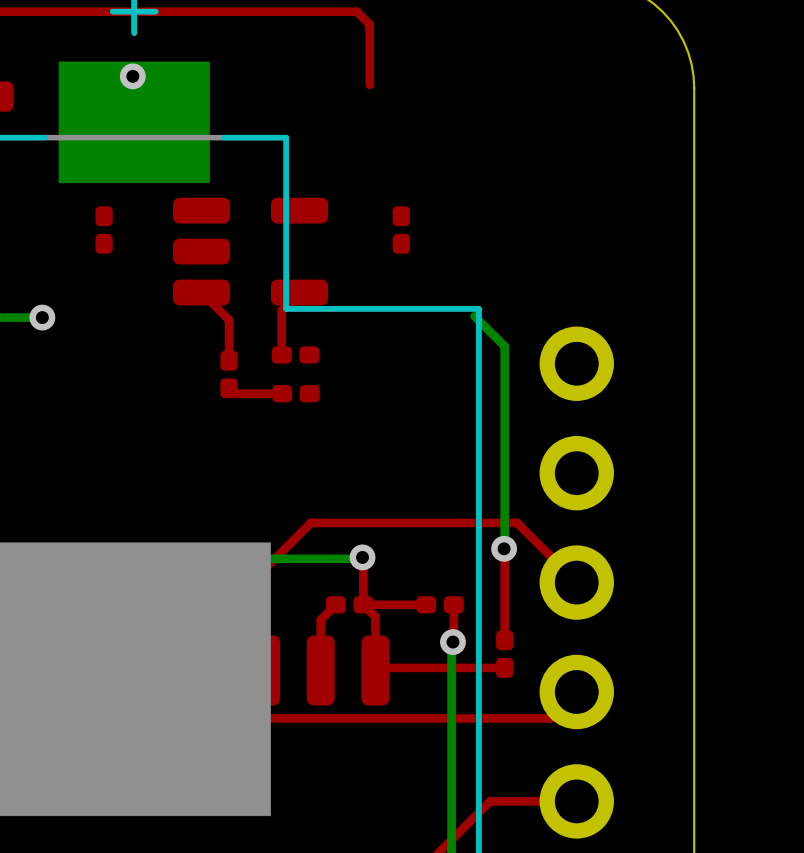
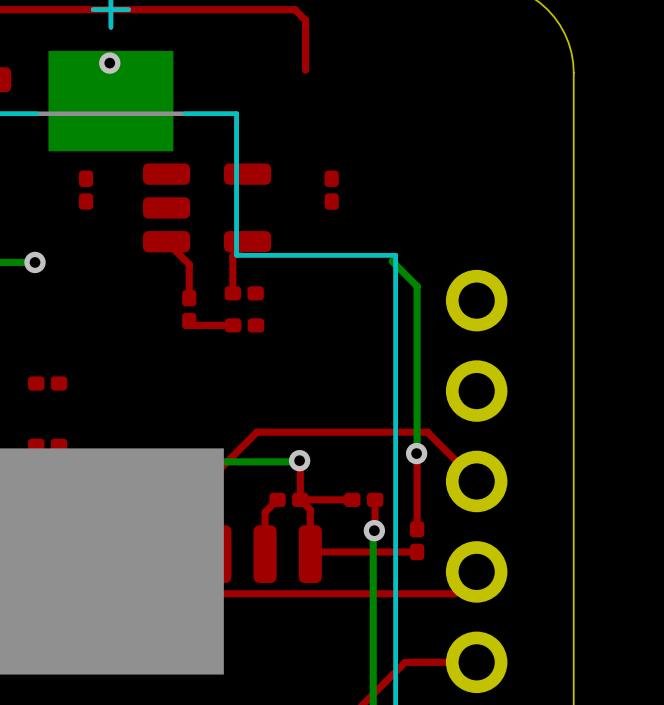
part: none -> (47, 383)
part: none -> (47, 445)

